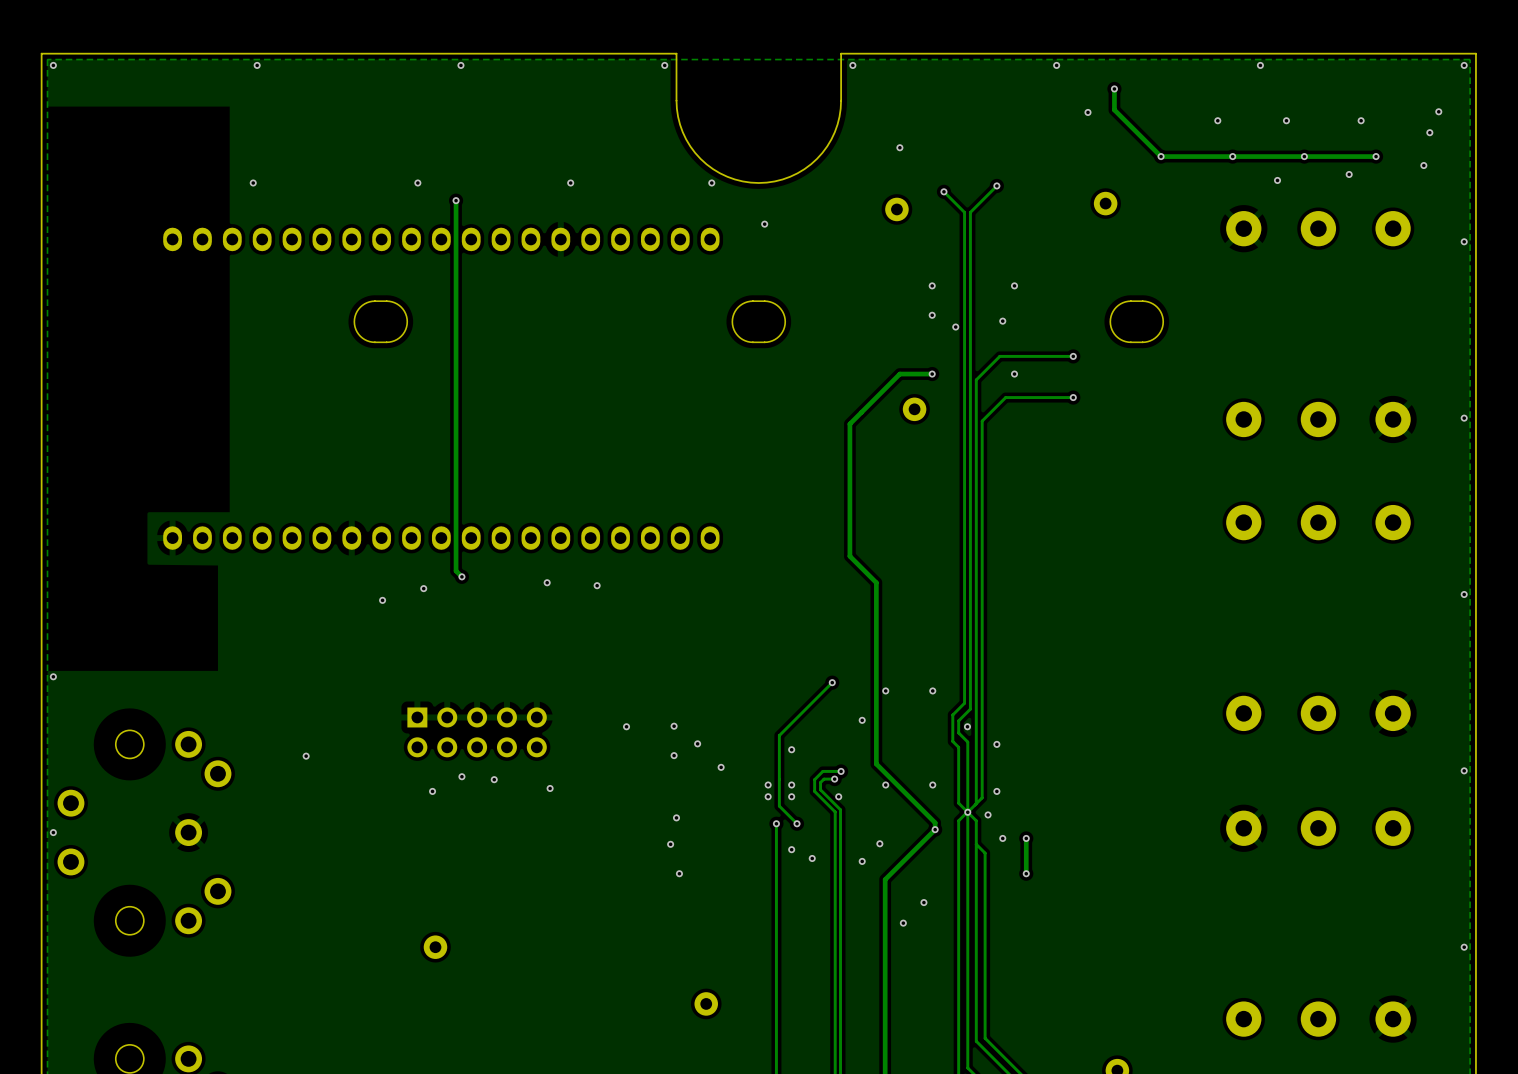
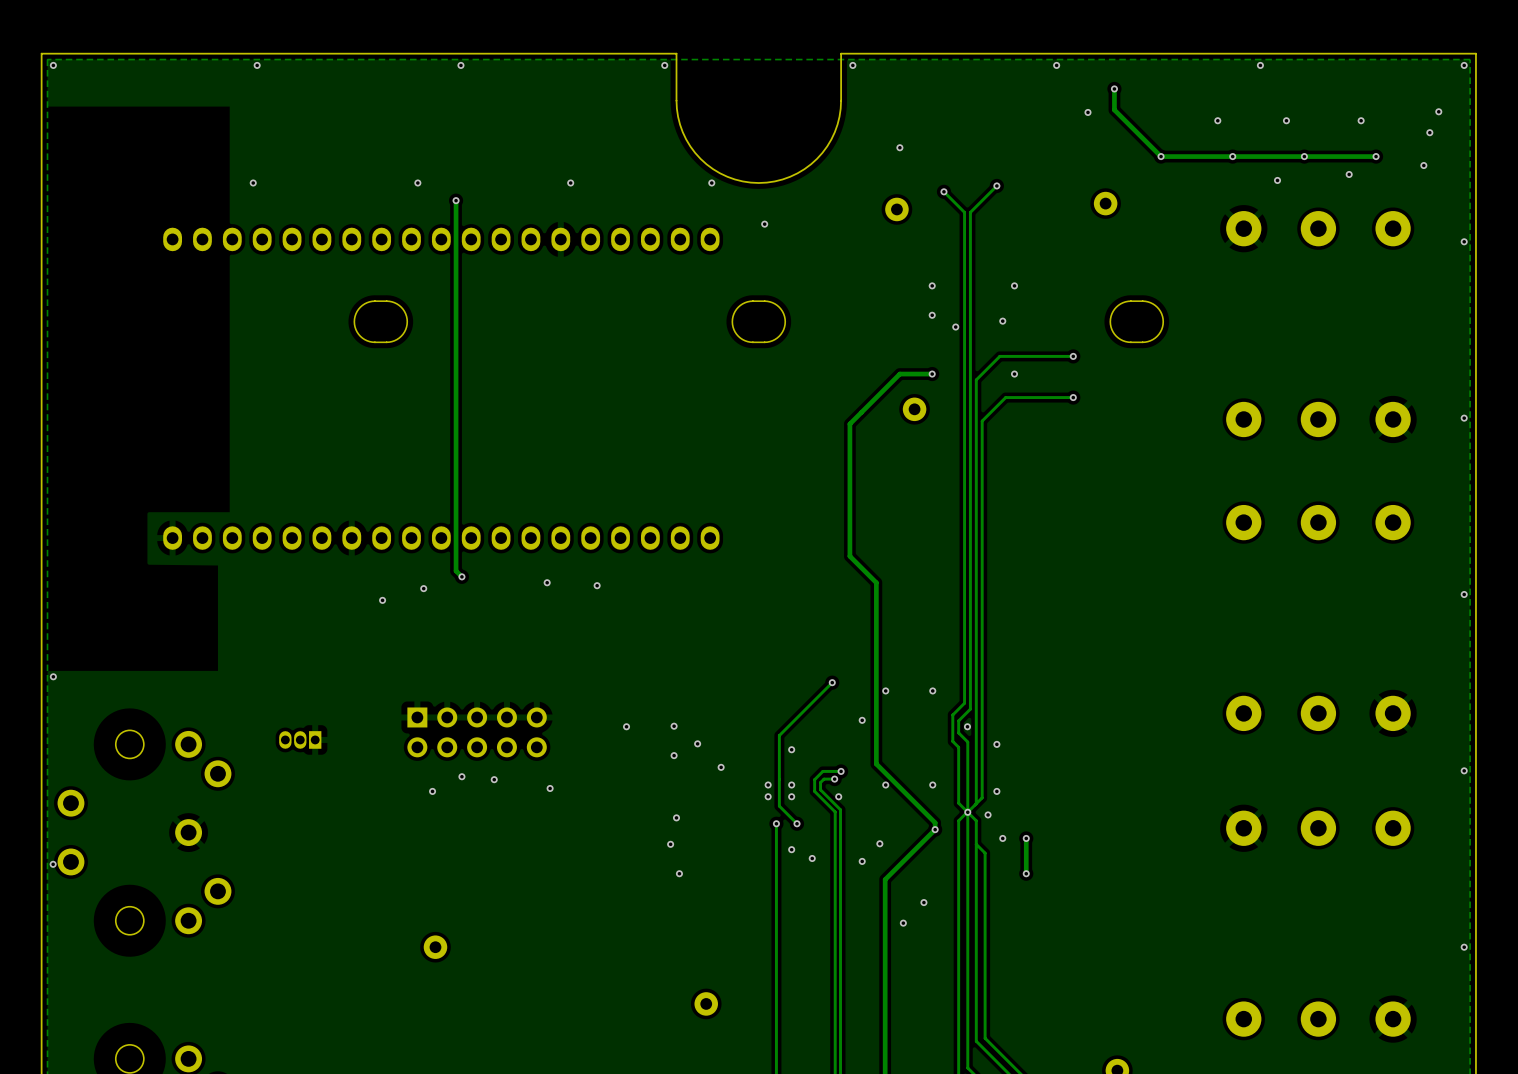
part: none -> (300, 739)
via: (306, 756) -> none
via position: (53, 832) -> (53, 864)

